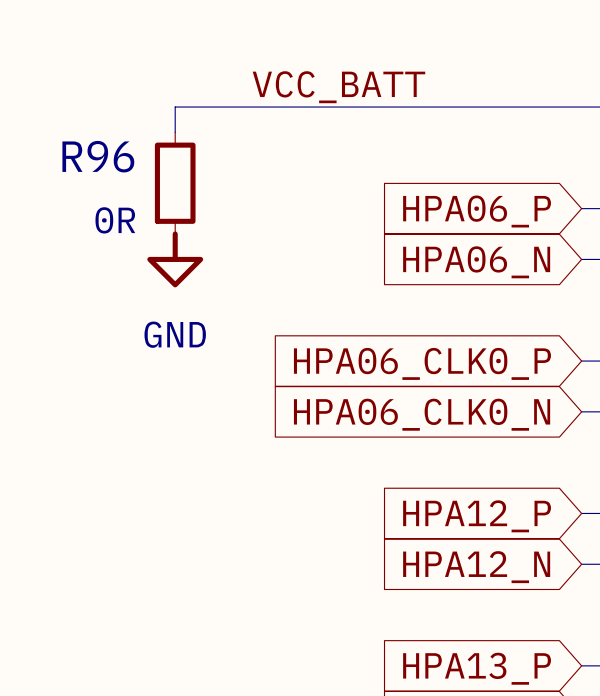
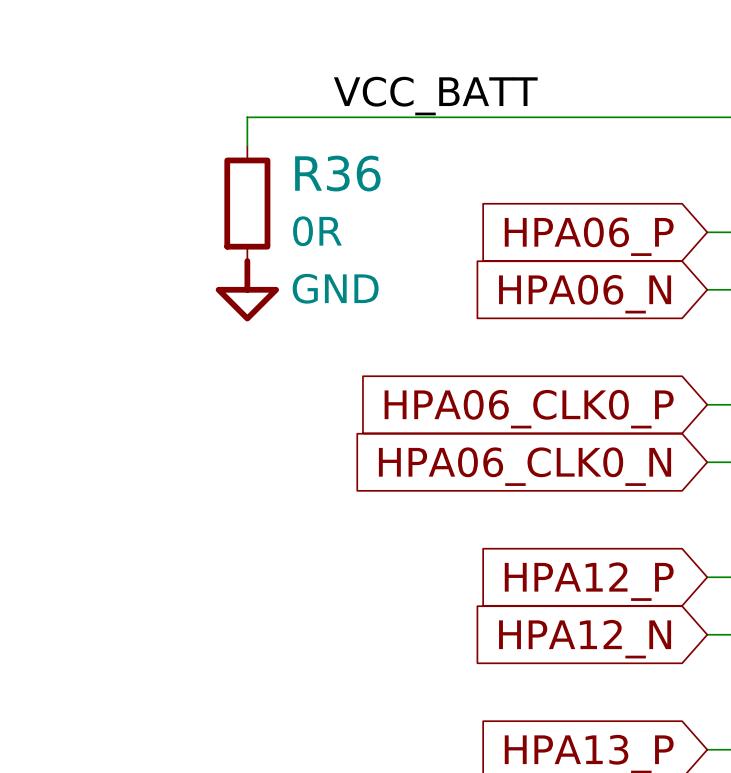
R96 name: R96 (98, 156) -> R36 (337, 173)
R96 text position: 0R (115, 220) -> 0R (317, 231)
power symbol text position: GND (175, 334) -> GND (335, 288)

